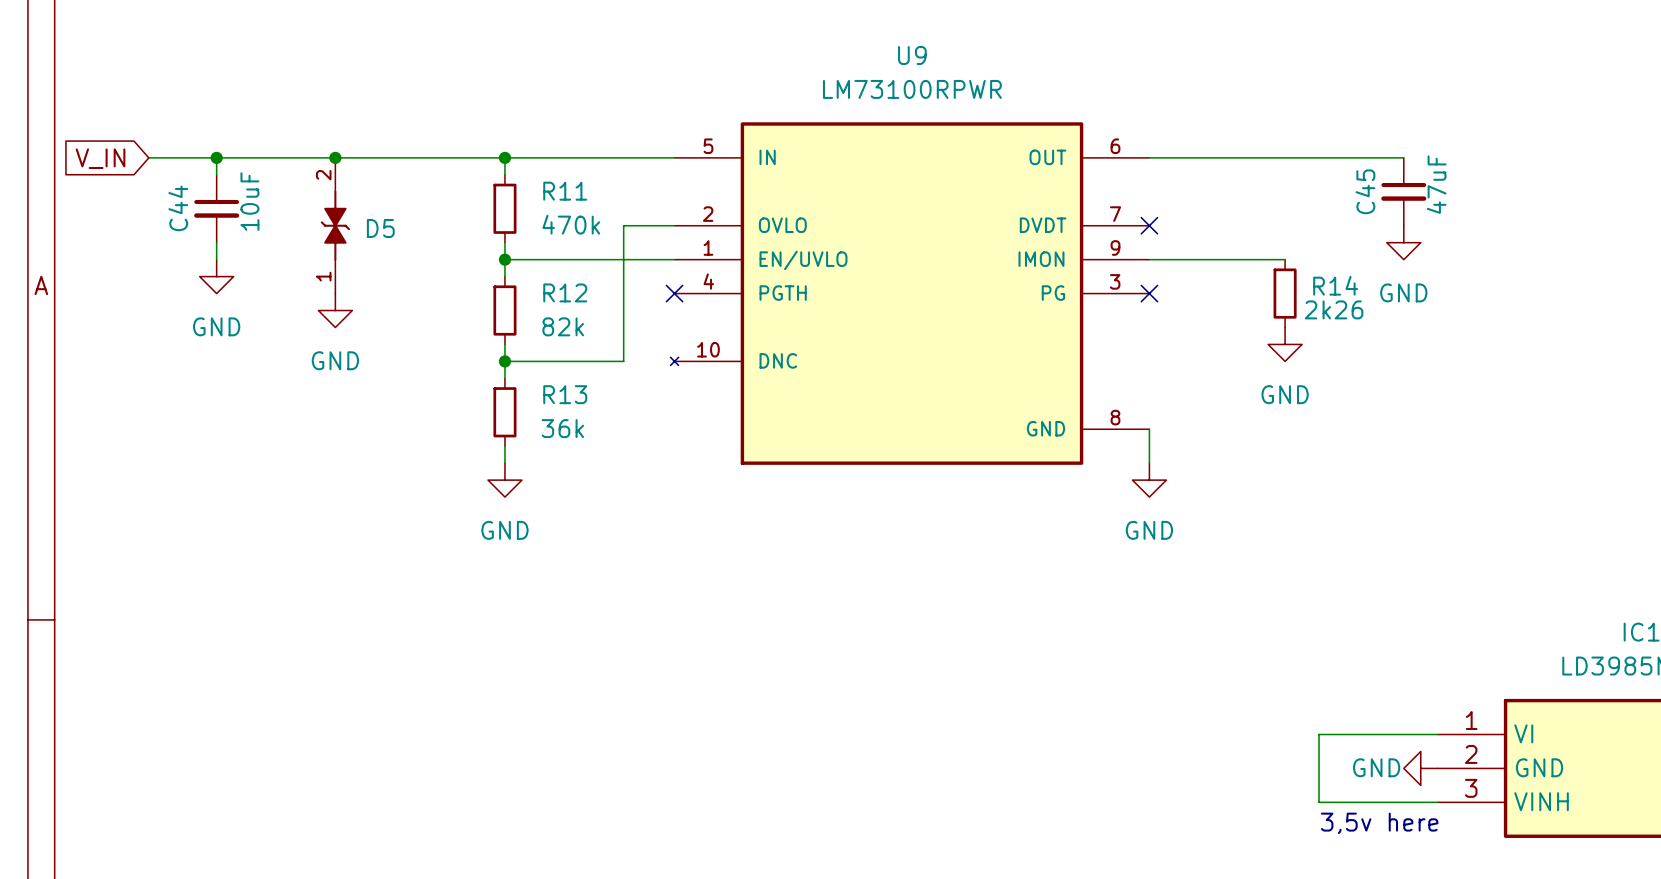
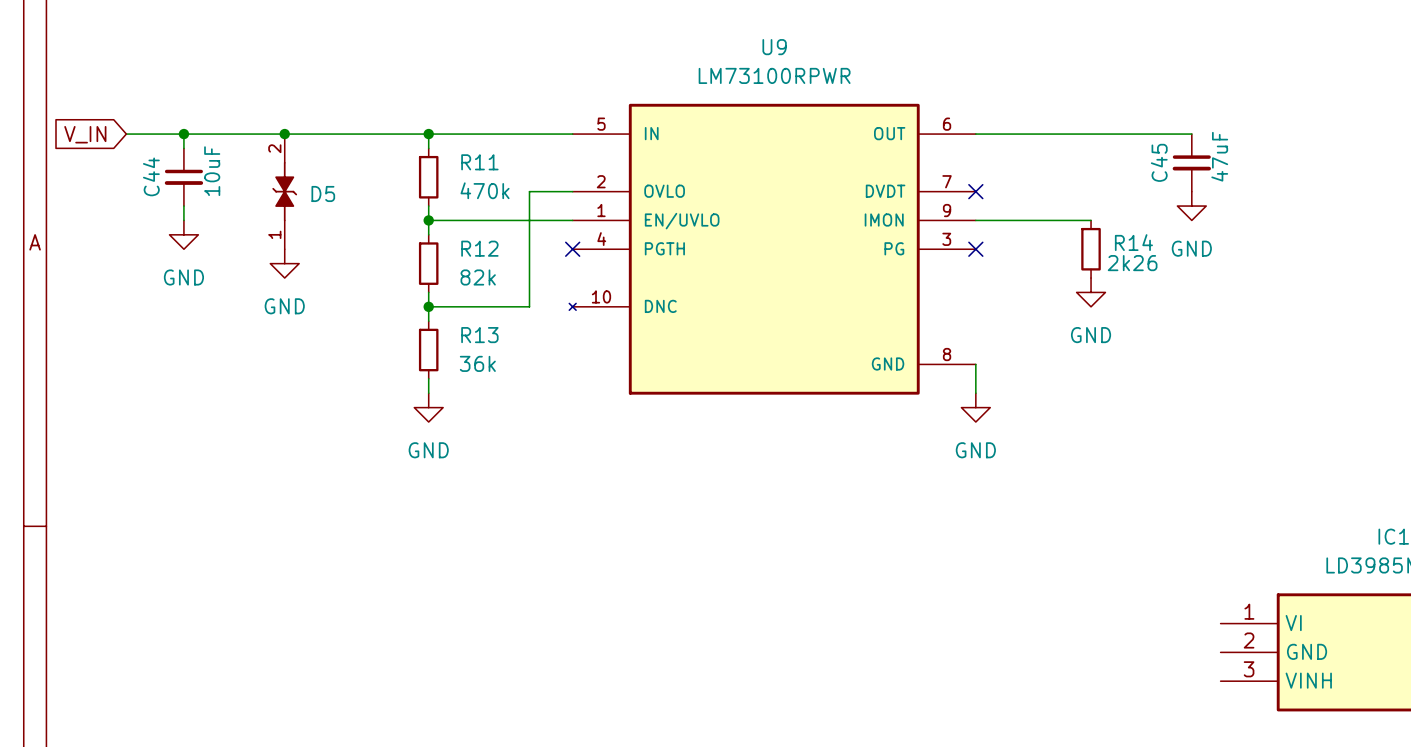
wire: (1437, 734) (1319, 734) (1319, 802) (1437, 802) -> none
power symbol: GND (1420, 768) -> none
text: 3,5v here (1379, 823) -> none

